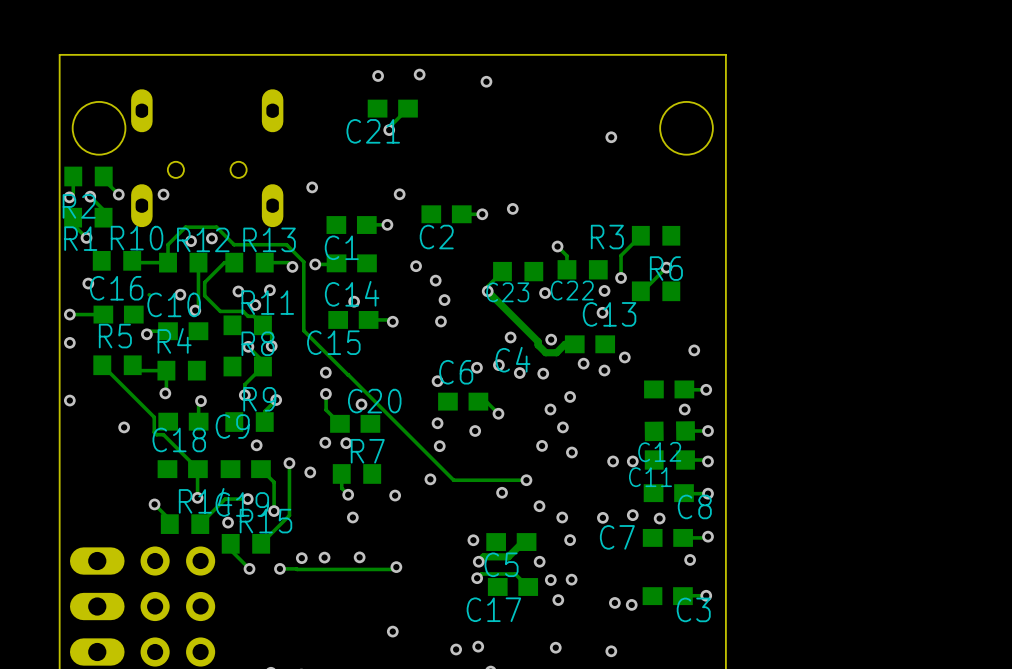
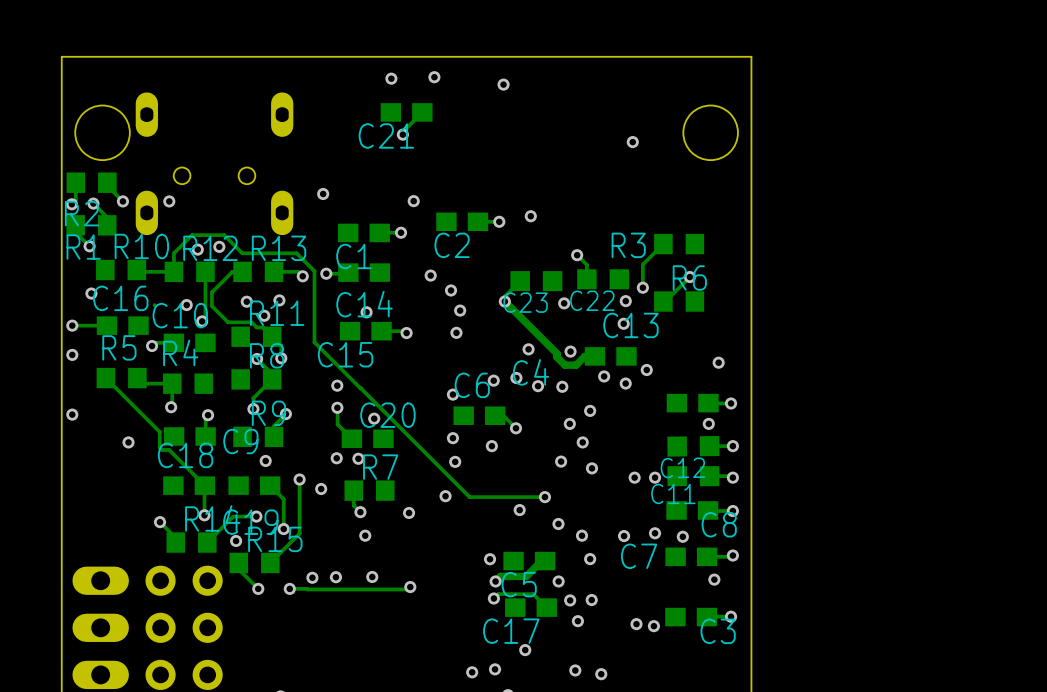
via: none -> (525, 650)
via: (392, 631) -> none
via position: (611, 651) -> (601, 674)

